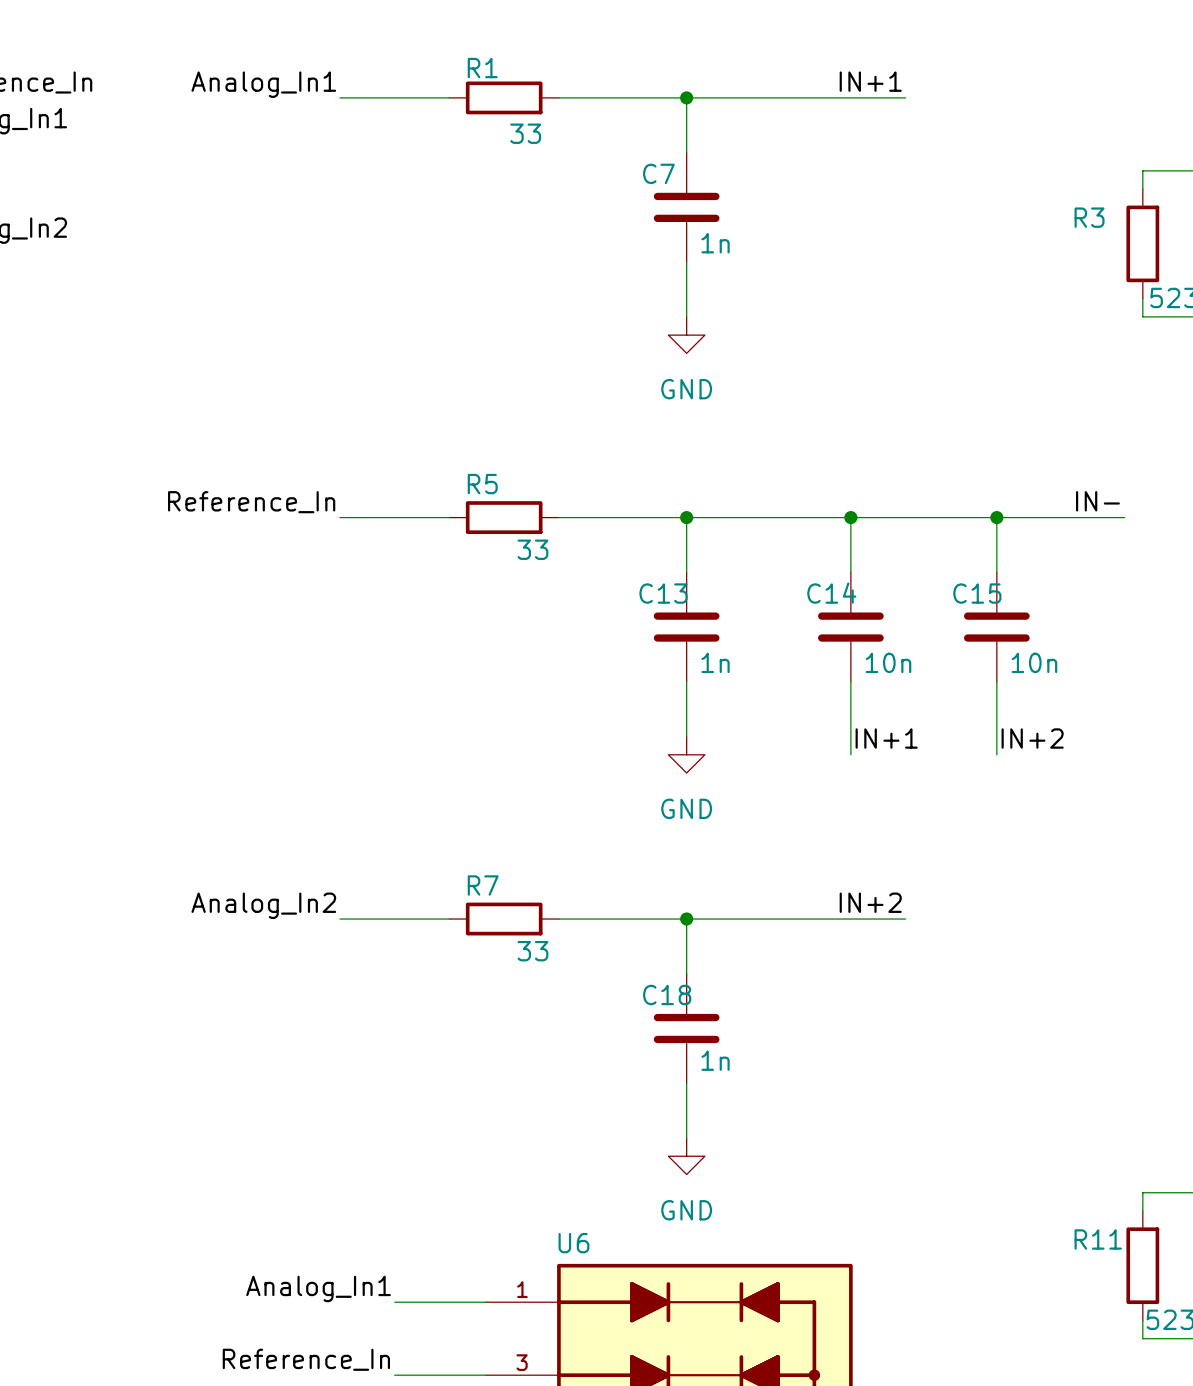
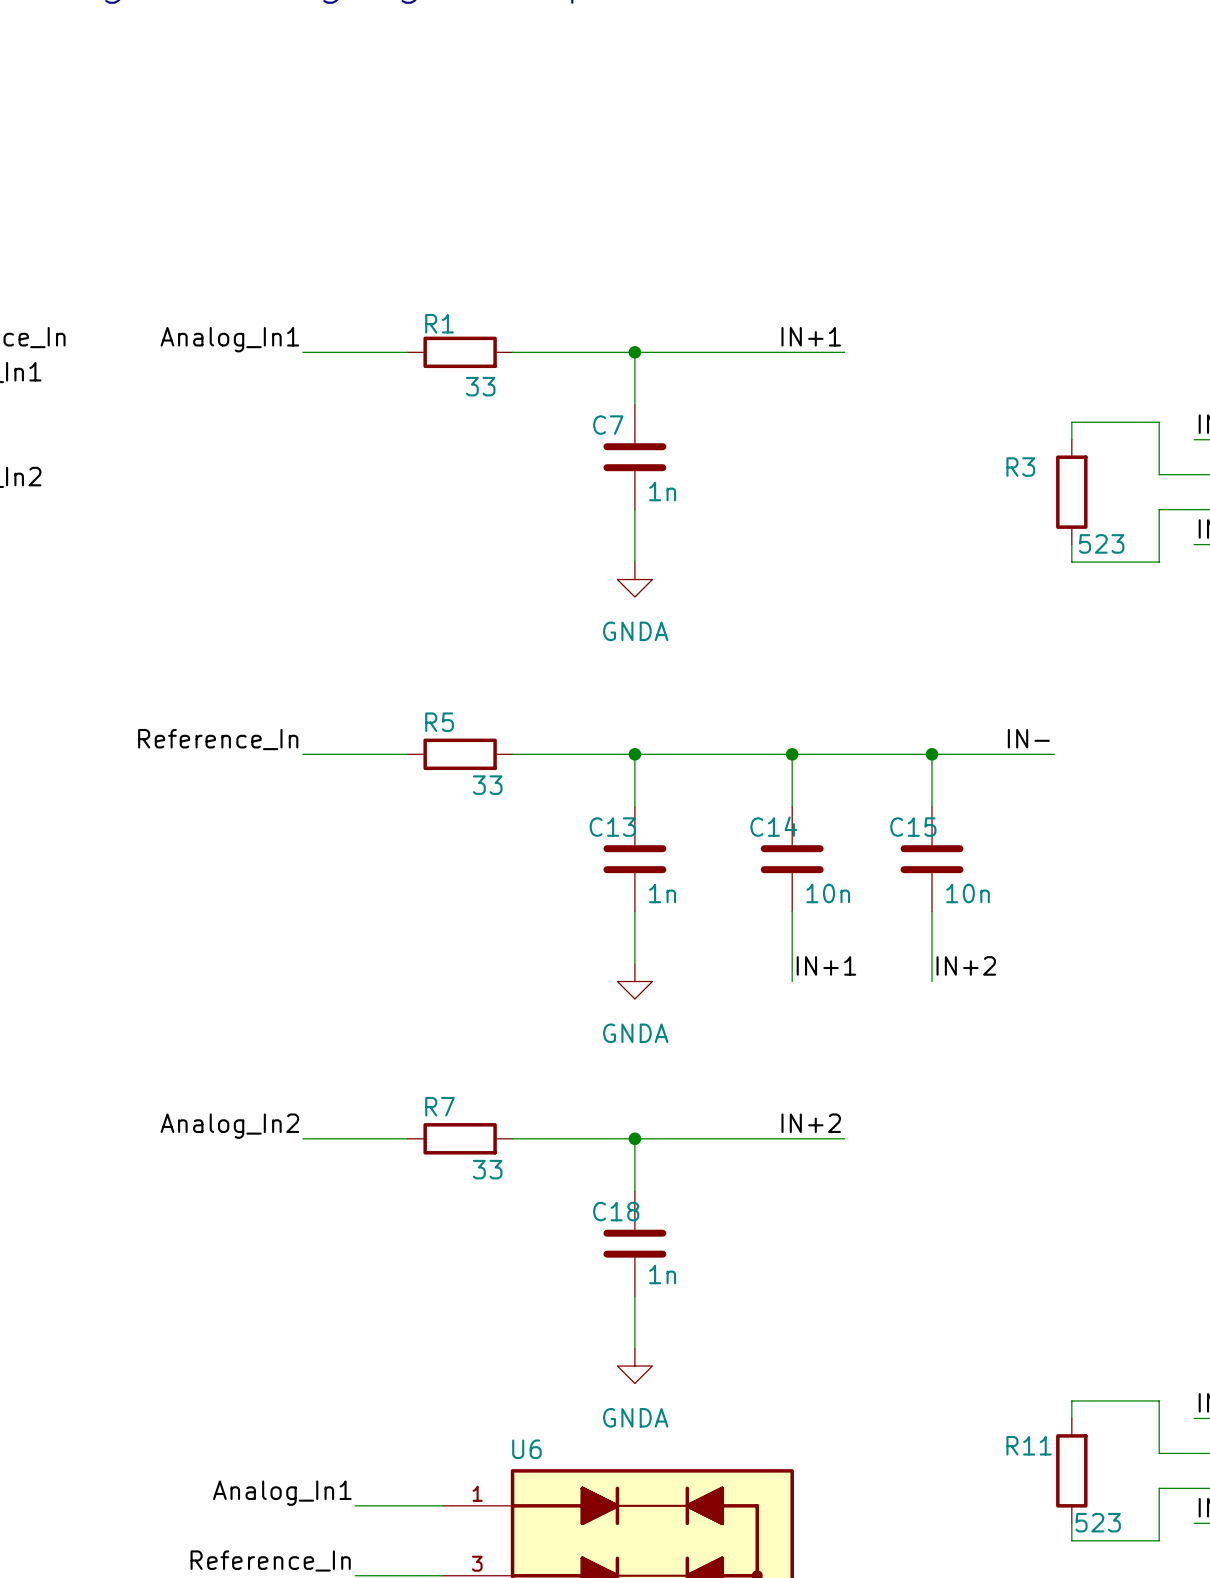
power symbol: GND (686, 335) -> GNDA (634, 579)
power symbol: GND (686, 754) -> GNDA (634, 981)
power symbol: GND (686, 1156) -> GNDA (634, 1366)

